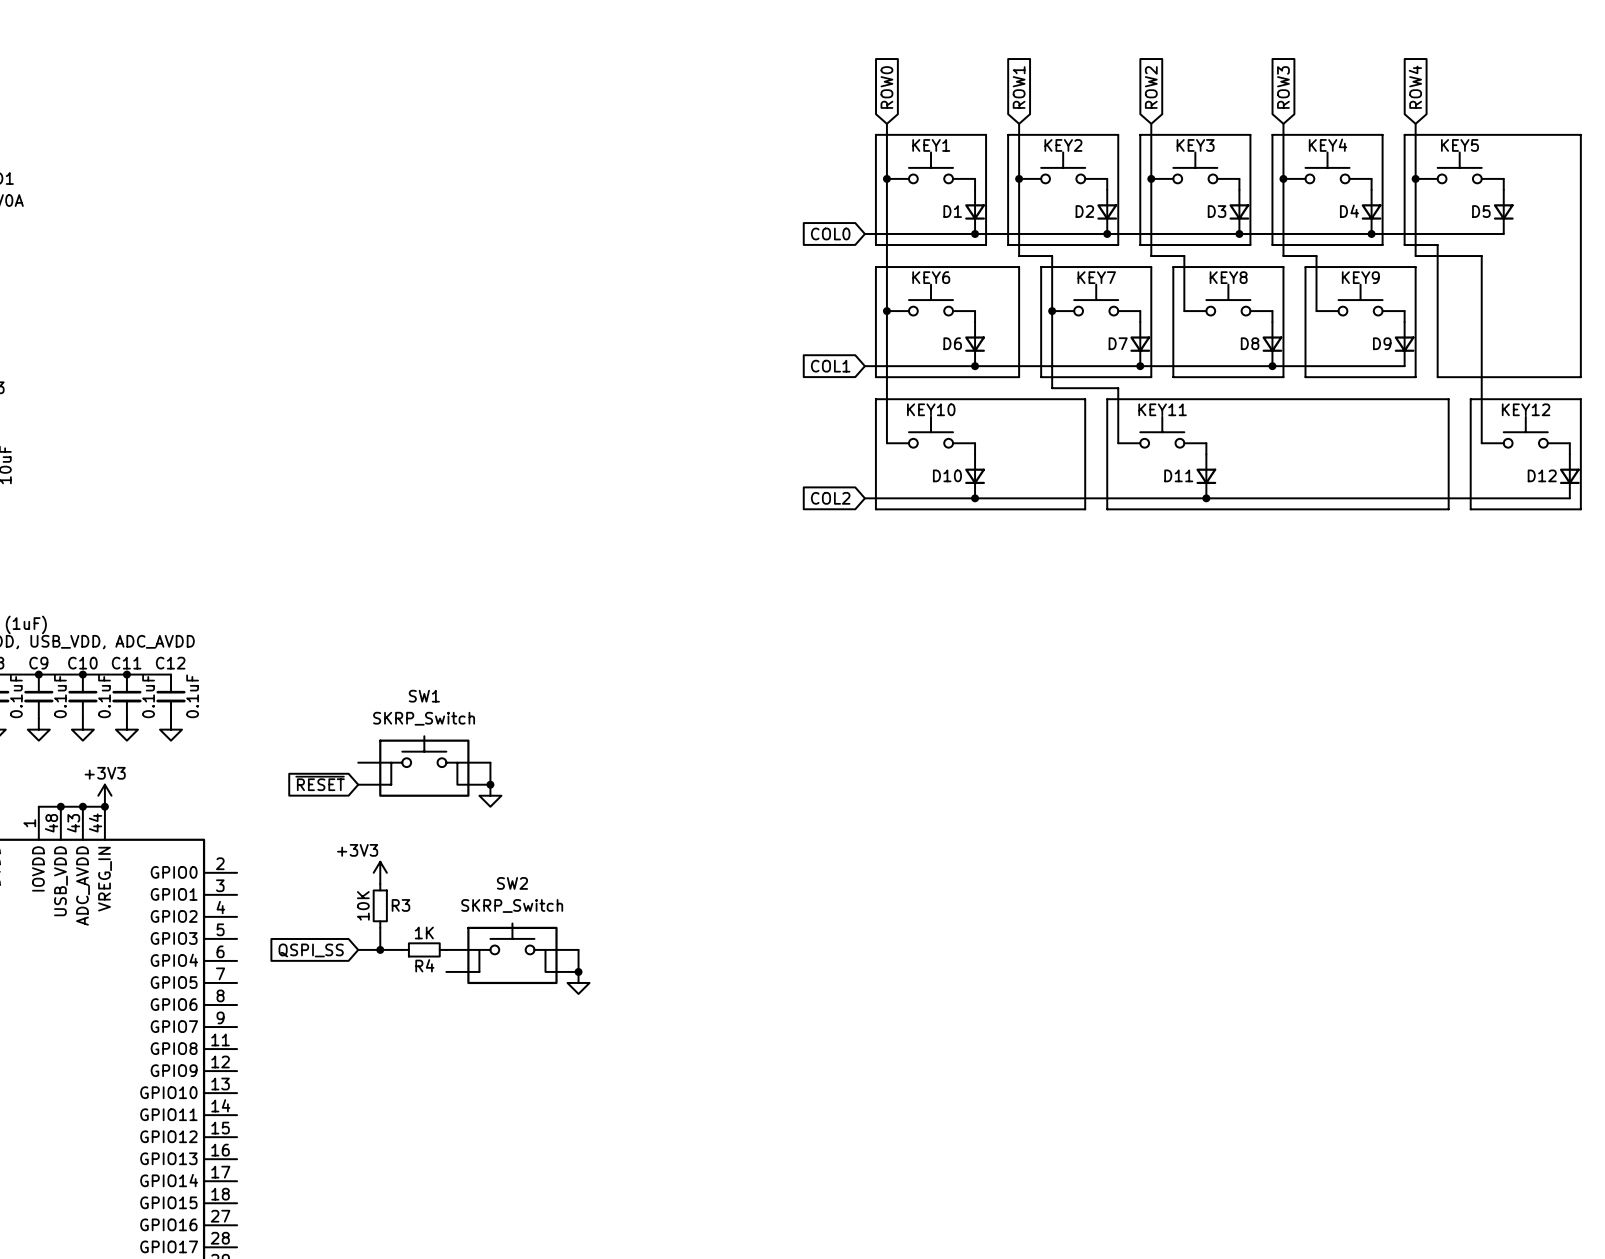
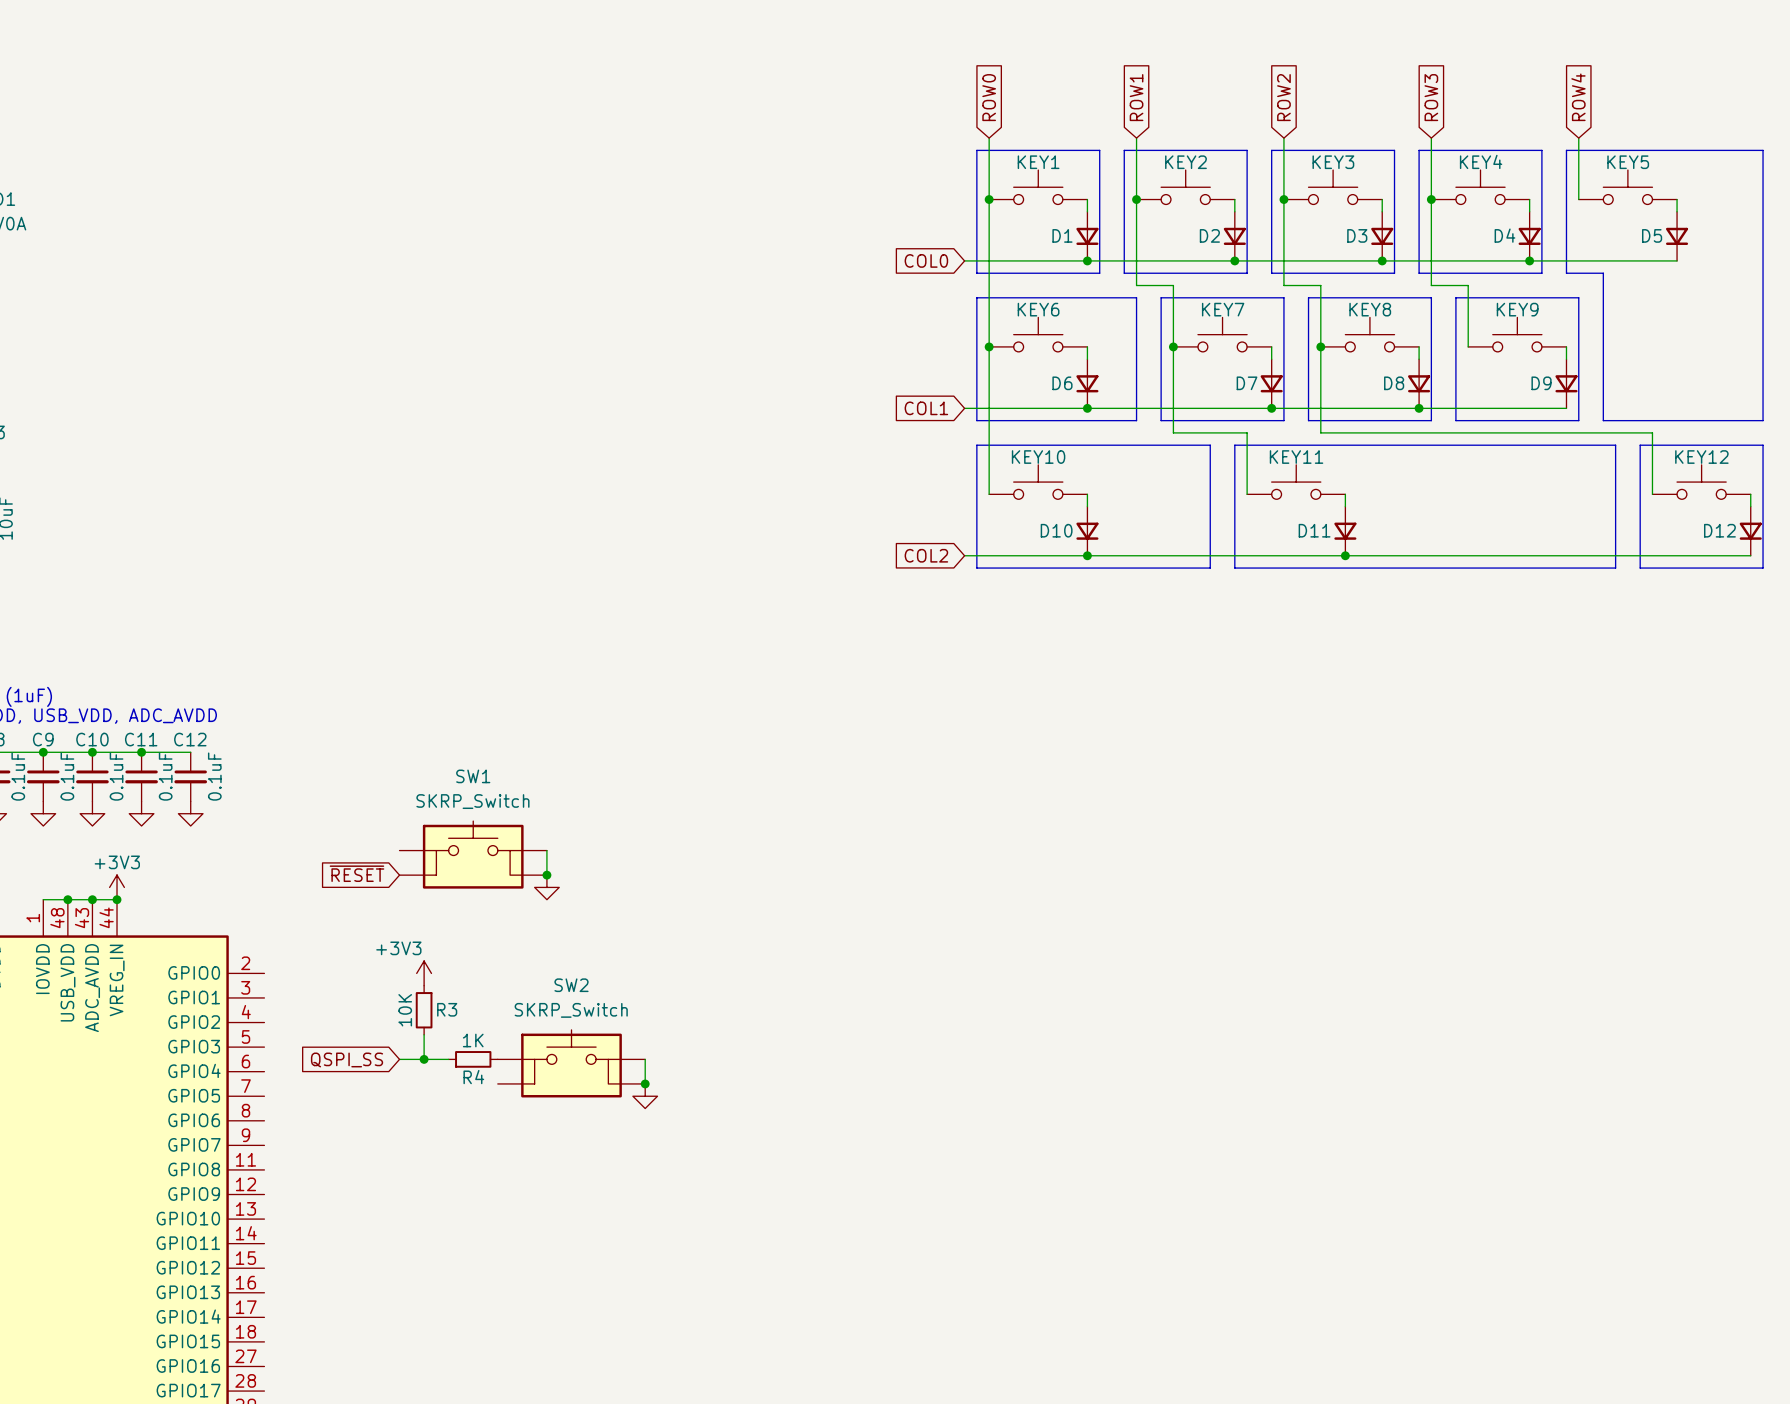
wire: (1415, 178) (1415, 256) (1481, 256) (1481, 388) -> (1320, 346) (1320, 432) (1652, 432)
junction: (1415, 178) -> none
junction: none -> (1320, 346)

